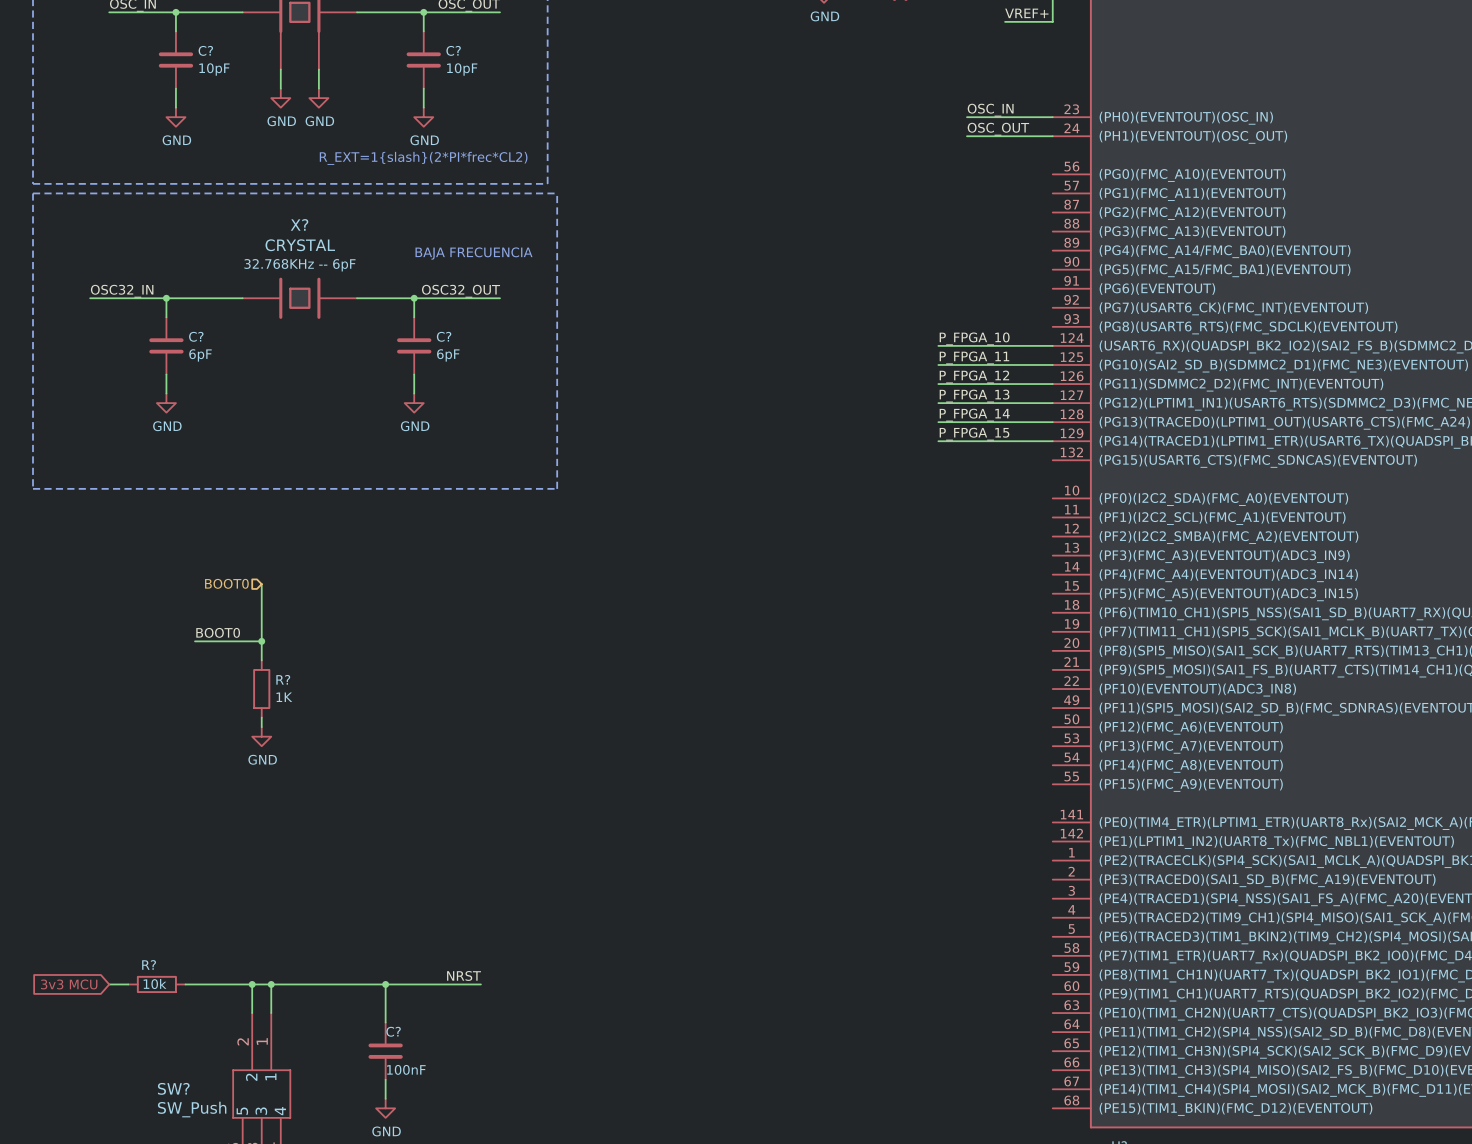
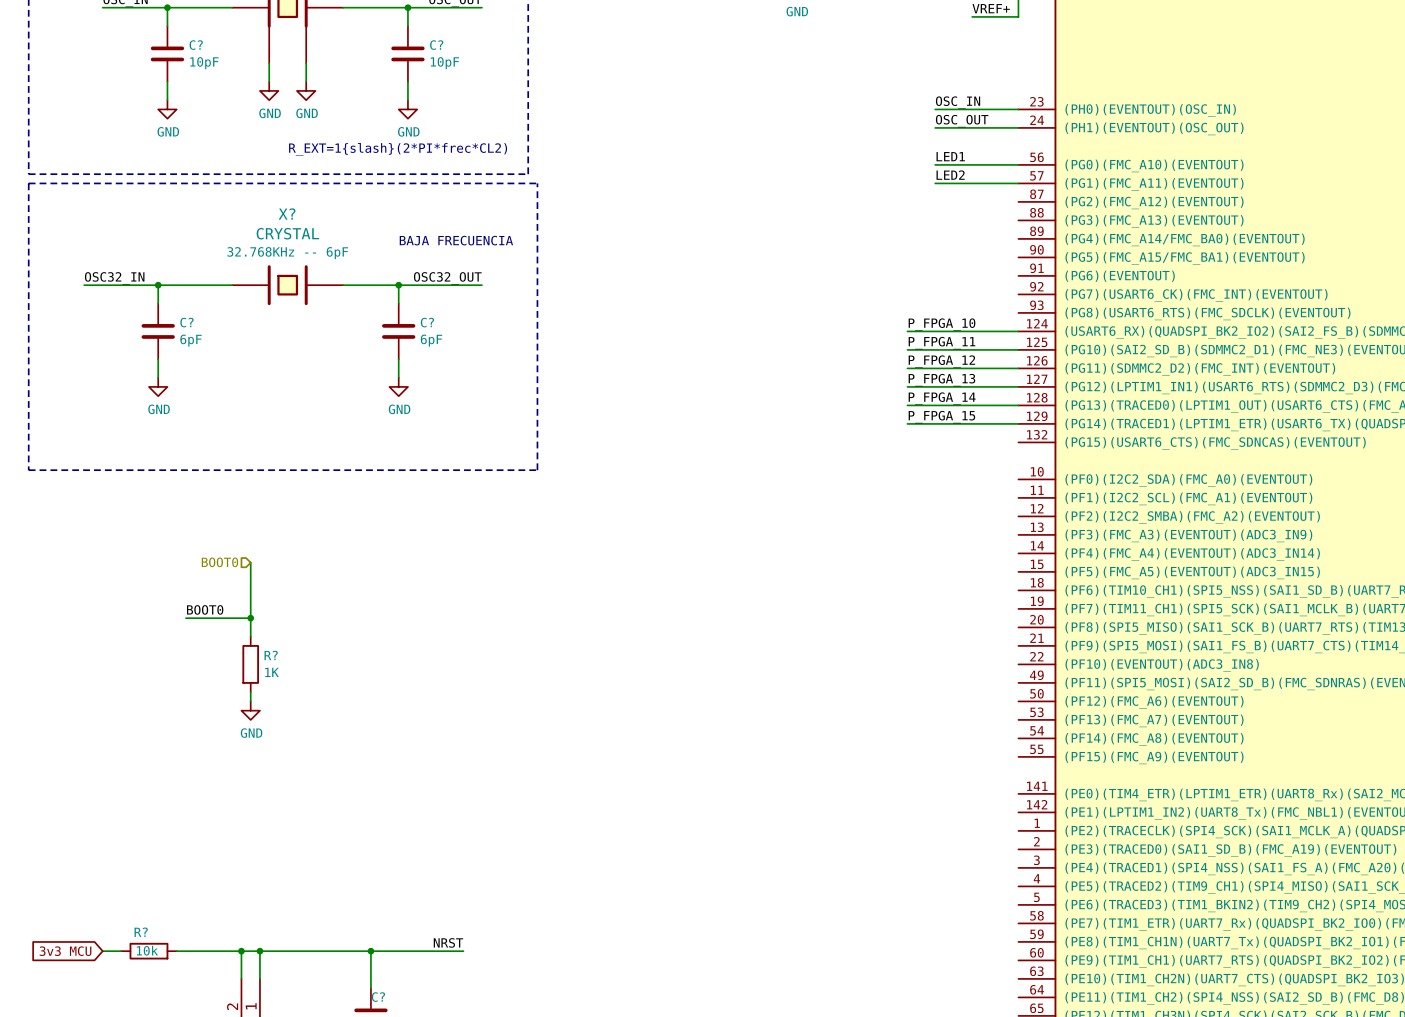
label: none -> LED1 (950, 156)
wire: none -> (935, 164) (1018, 164)
label: none -> LED2 (950, 175)
wire: none -> (935, 183) (1018, 183)

